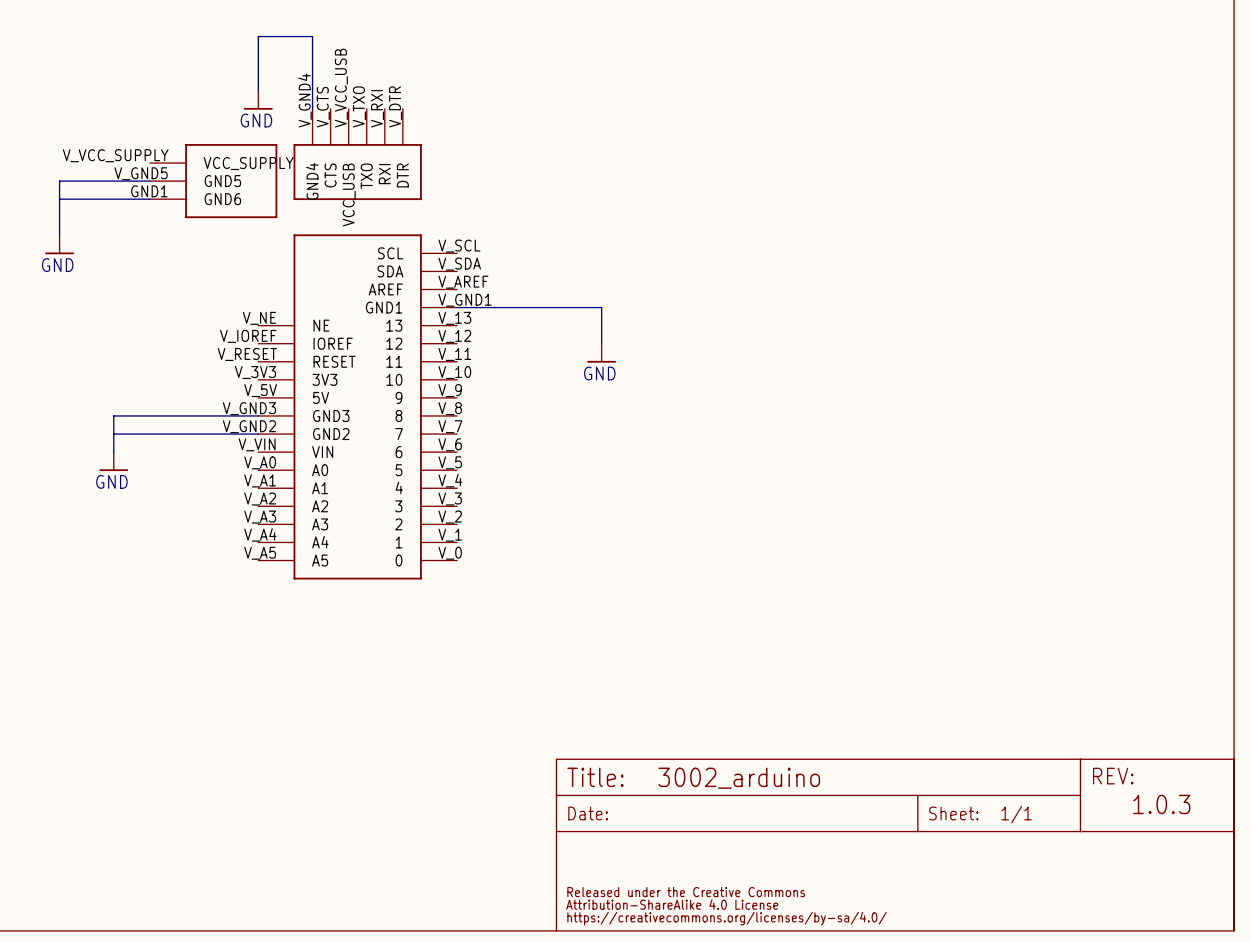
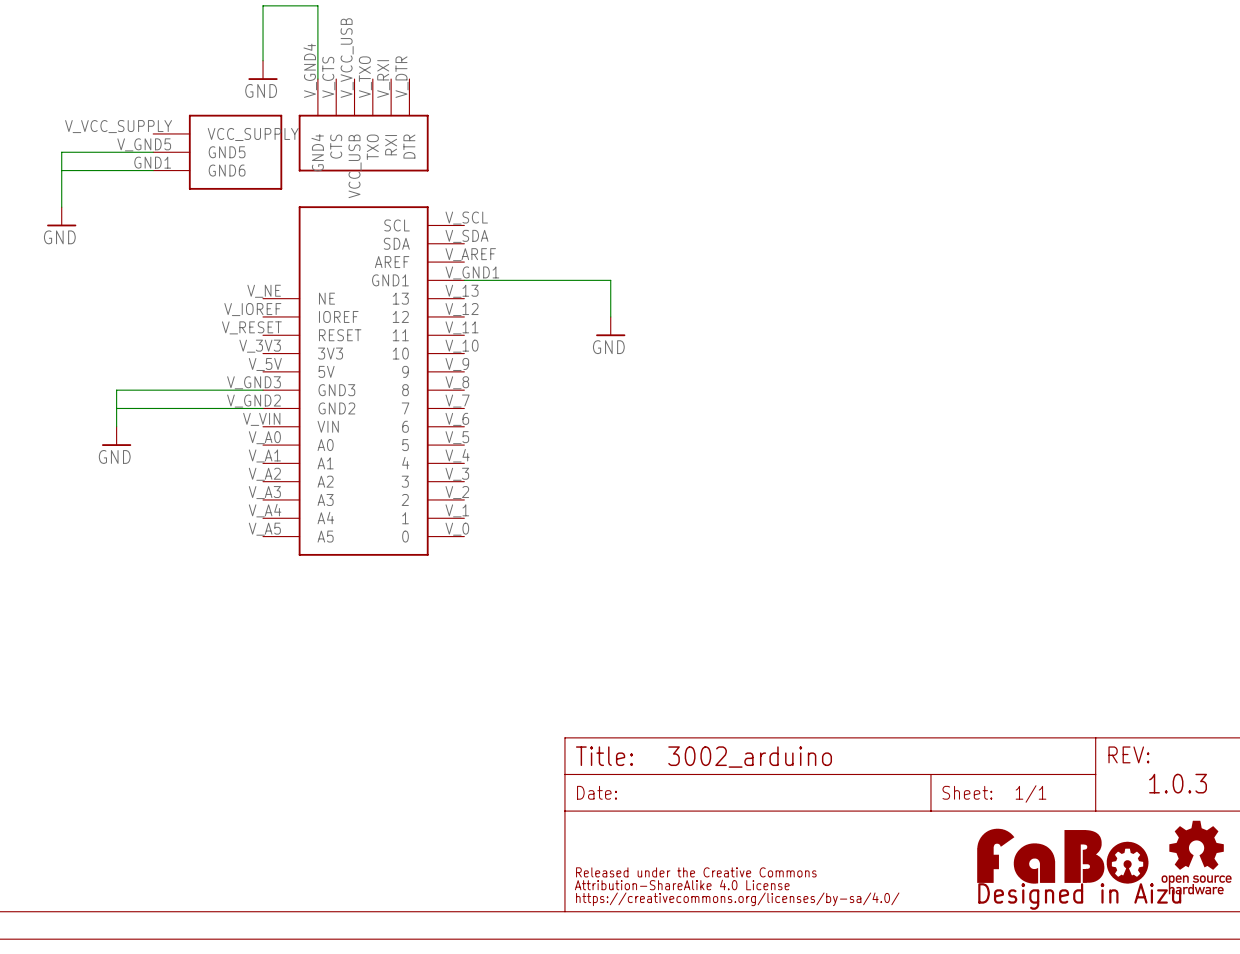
part: none -> (1062, 856)
part: none -> (1196, 857)

